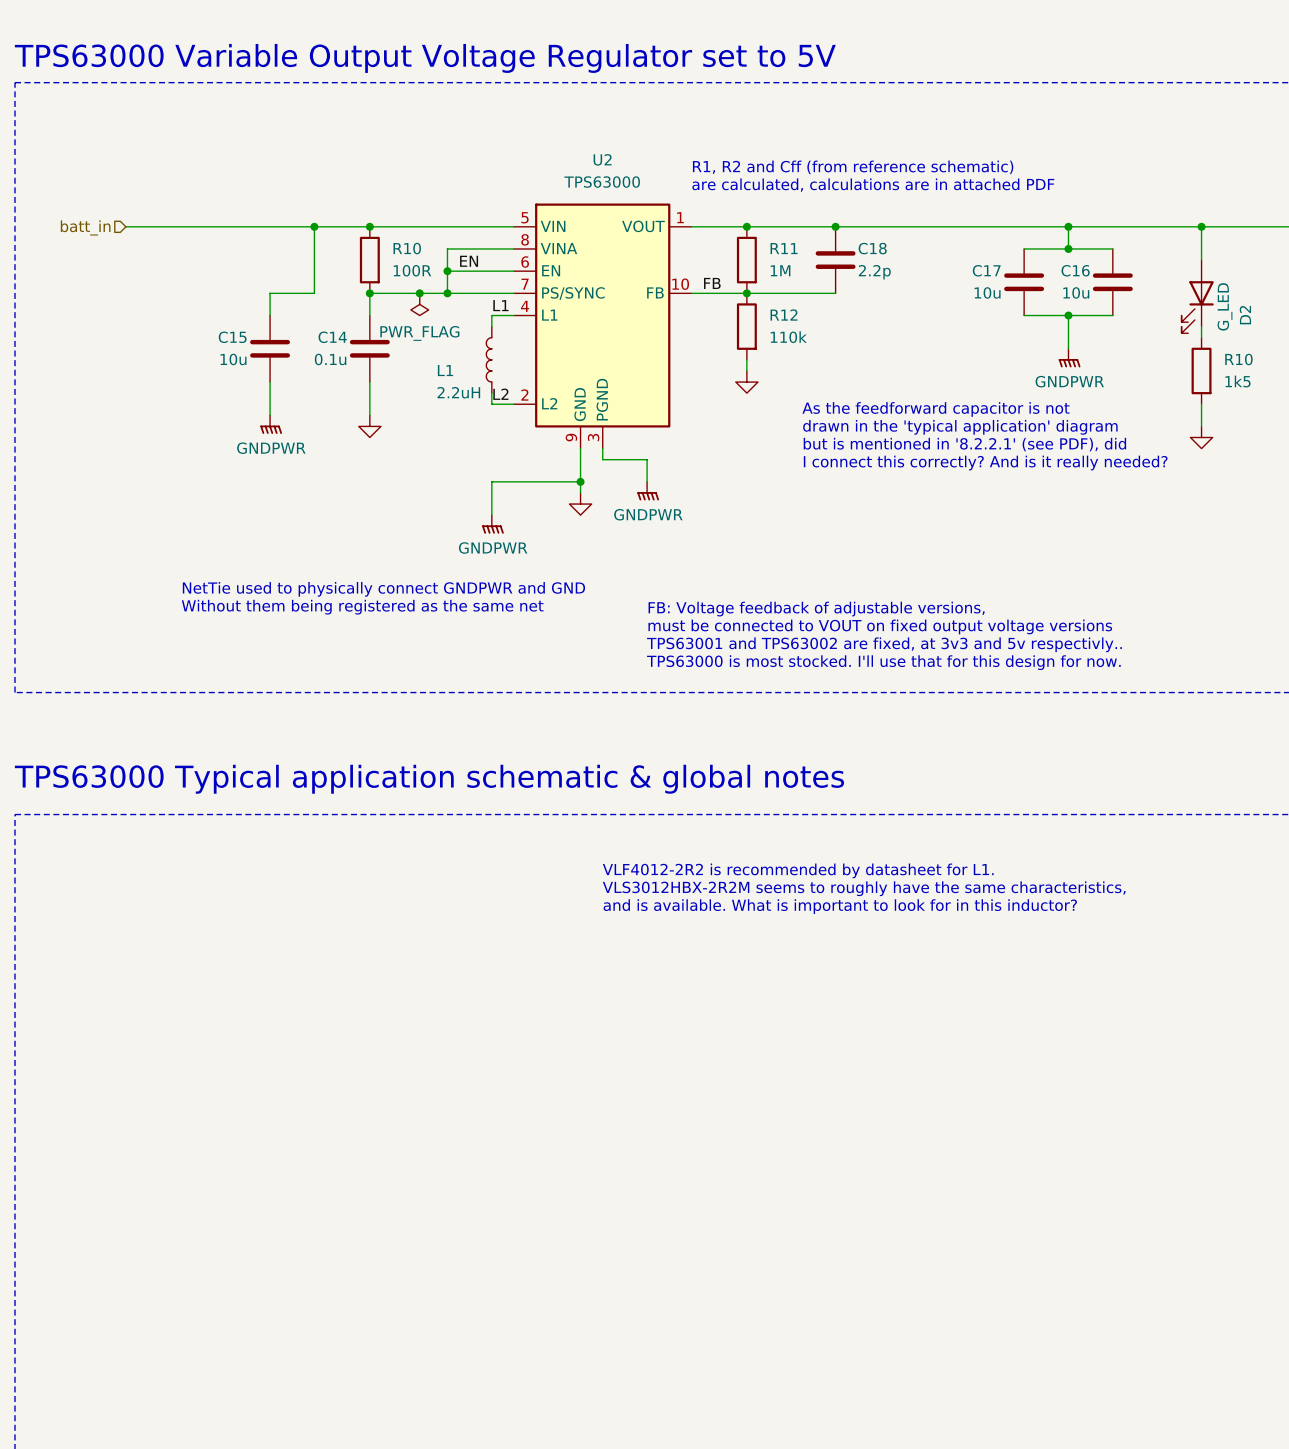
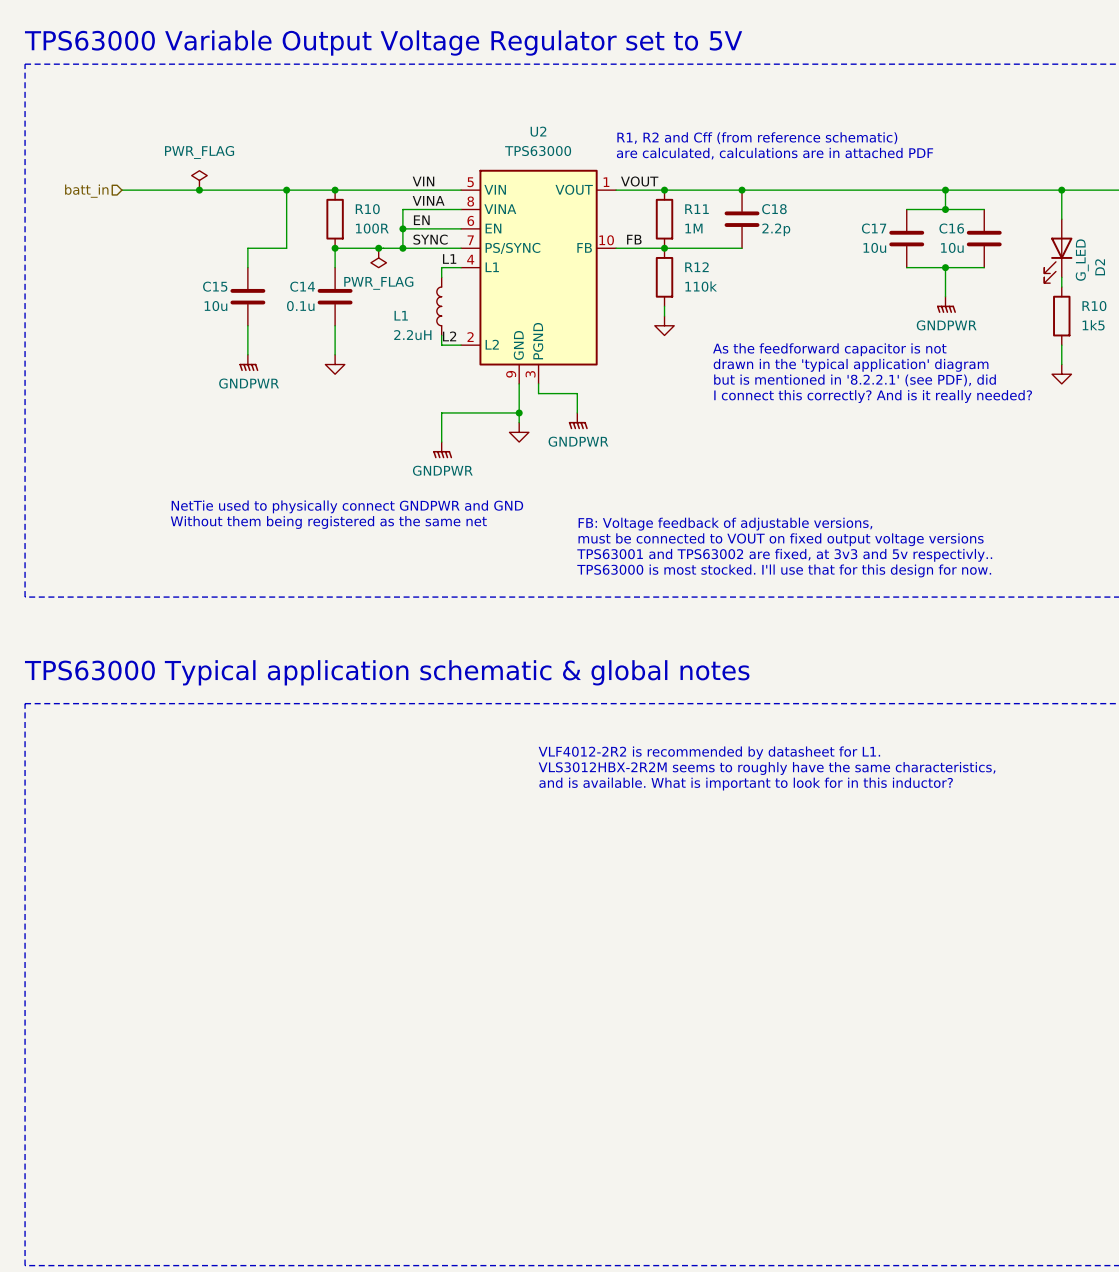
power symbol: none -> PWR_FLAG (199, 180)
label: none -> VIN (423, 181)
label: none -> VOUT (639, 181)
junction: none -> (199, 190)
label: none -> VINA (428, 200)
label: none -> SYNC (430, 239)

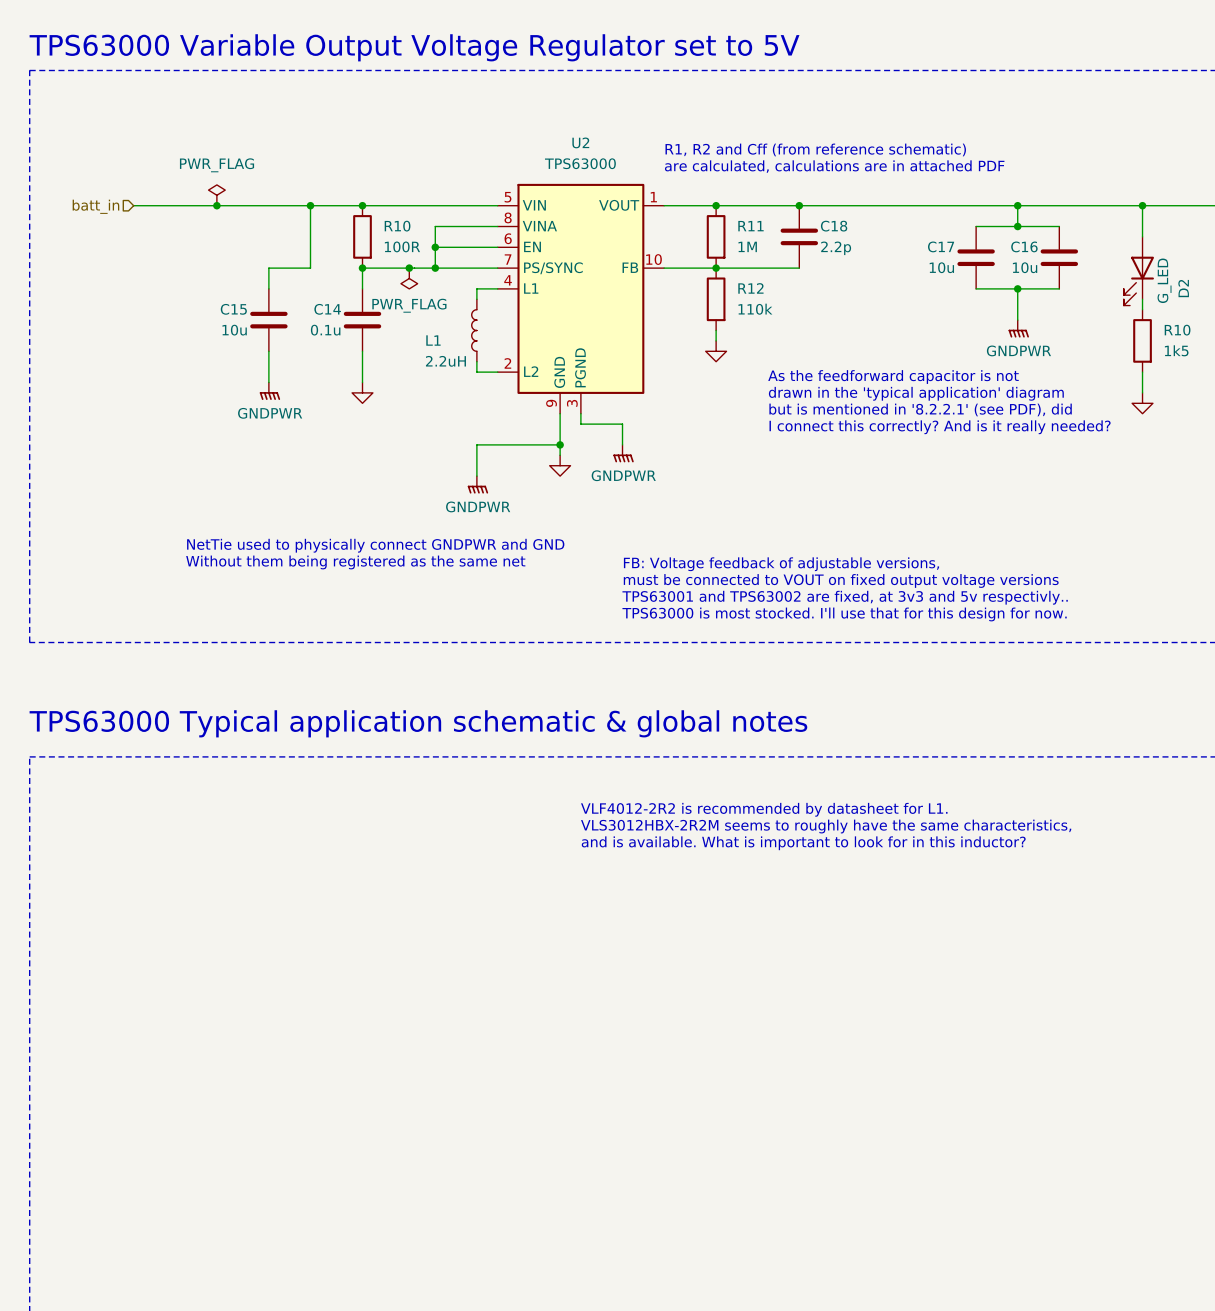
label: VIN (423, 181) -> none
label: VOUT (639, 181) -> none
label: VINA (428, 200) -> none
label: EN (421, 220) -> none
label: SYNC (430, 239) -> none
label: FB (634, 239) -> none
label: L1 (449, 258) -> none
label: L2 (449, 336) -> none

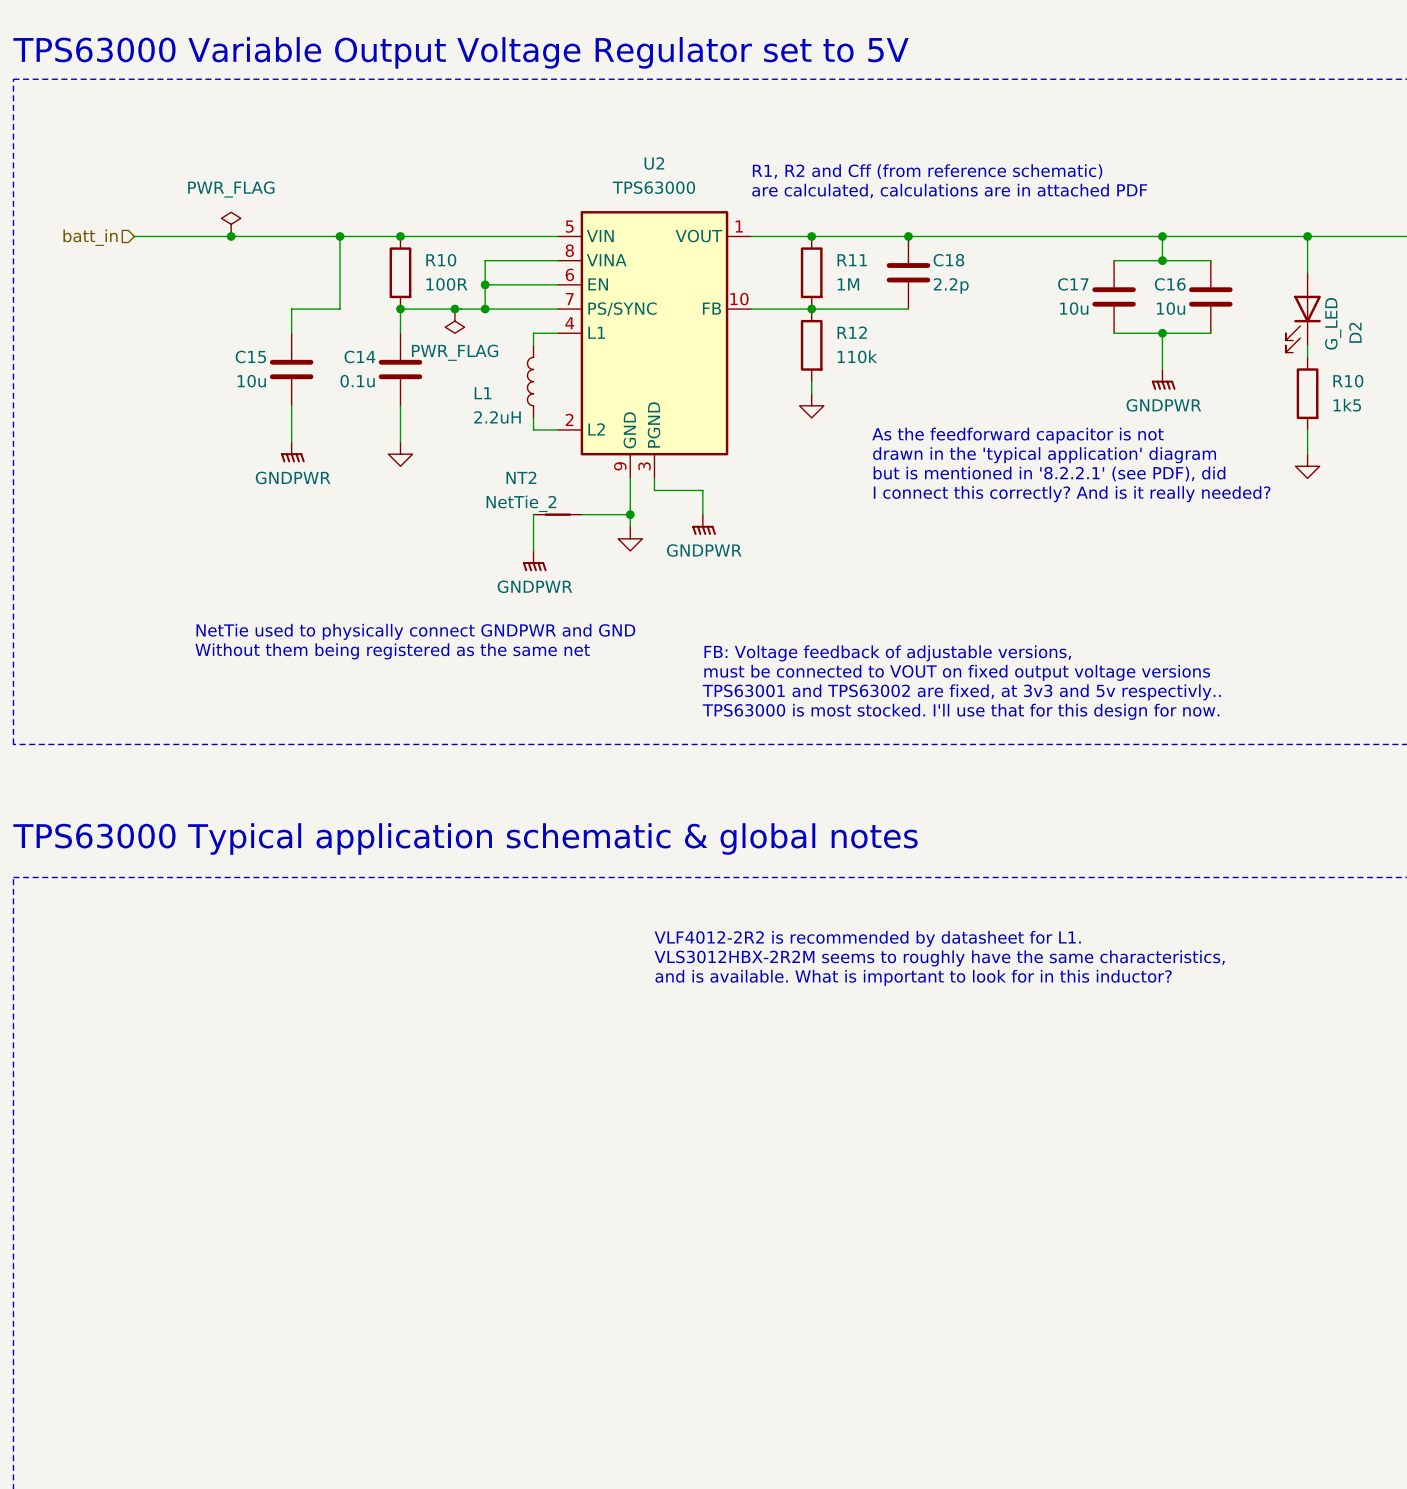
NT2: none -> NetTie_2 (557, 514)

